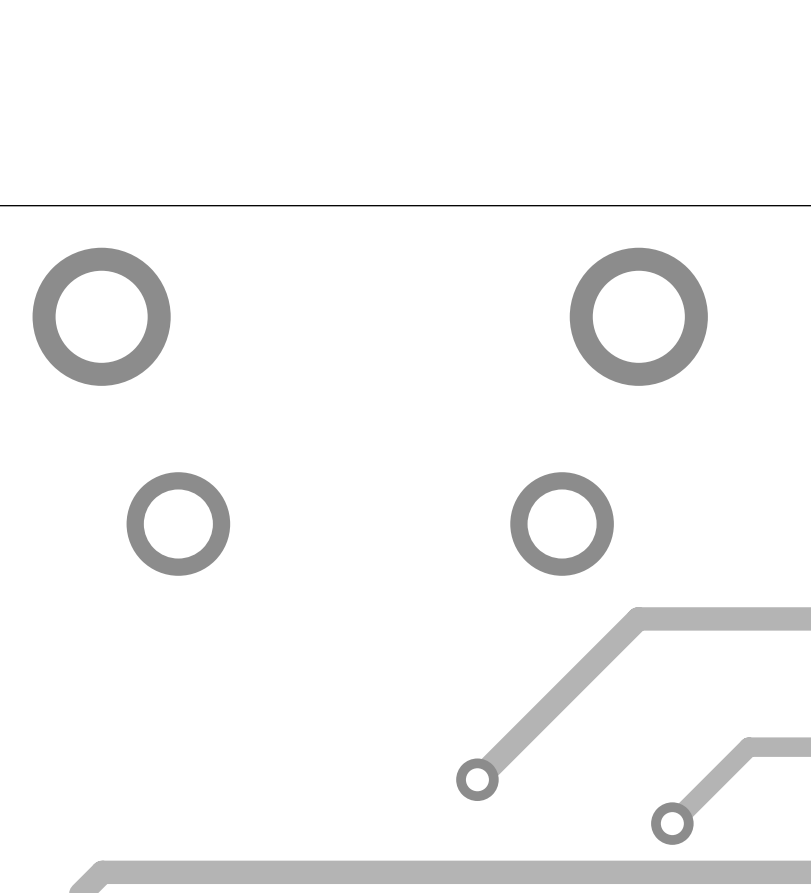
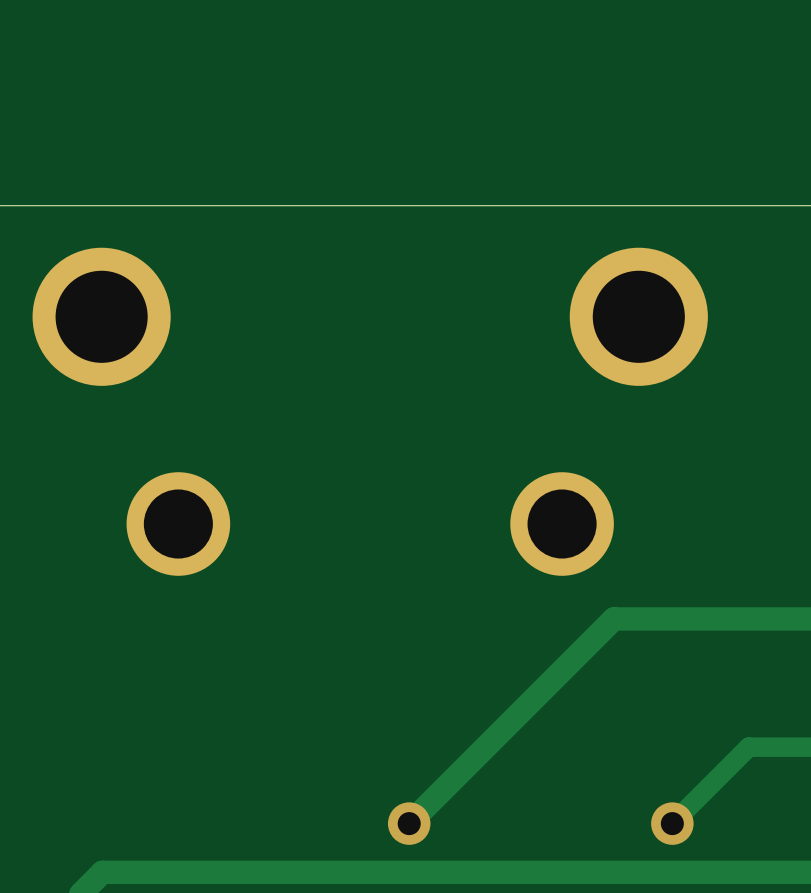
track: (638, 618) (477, 779) -> (638, 618) (613, 618) (409, 823)
via position: (477, 779) -> (409, 823)

